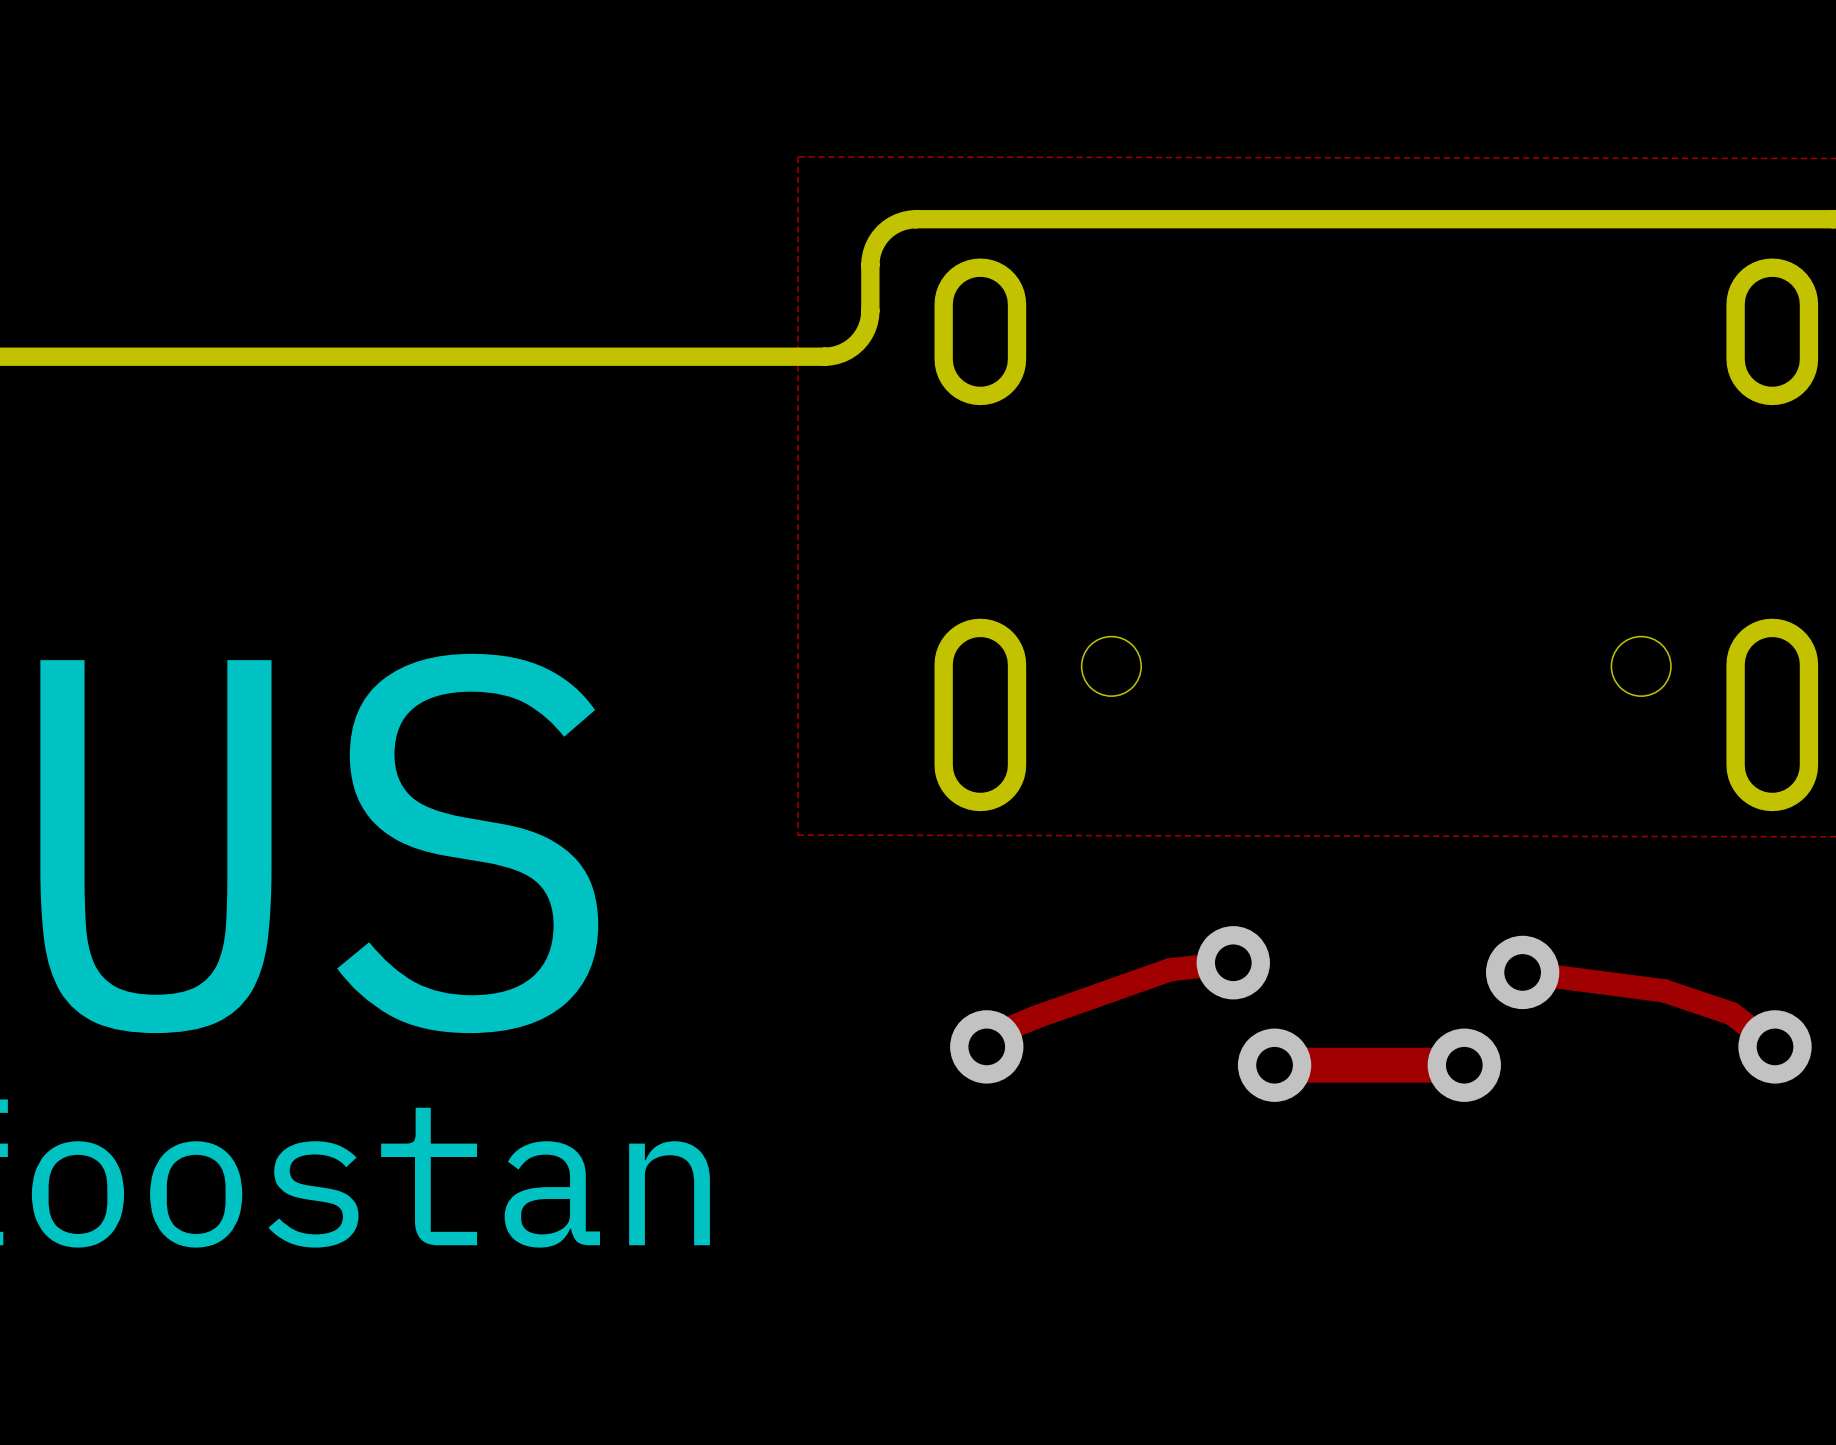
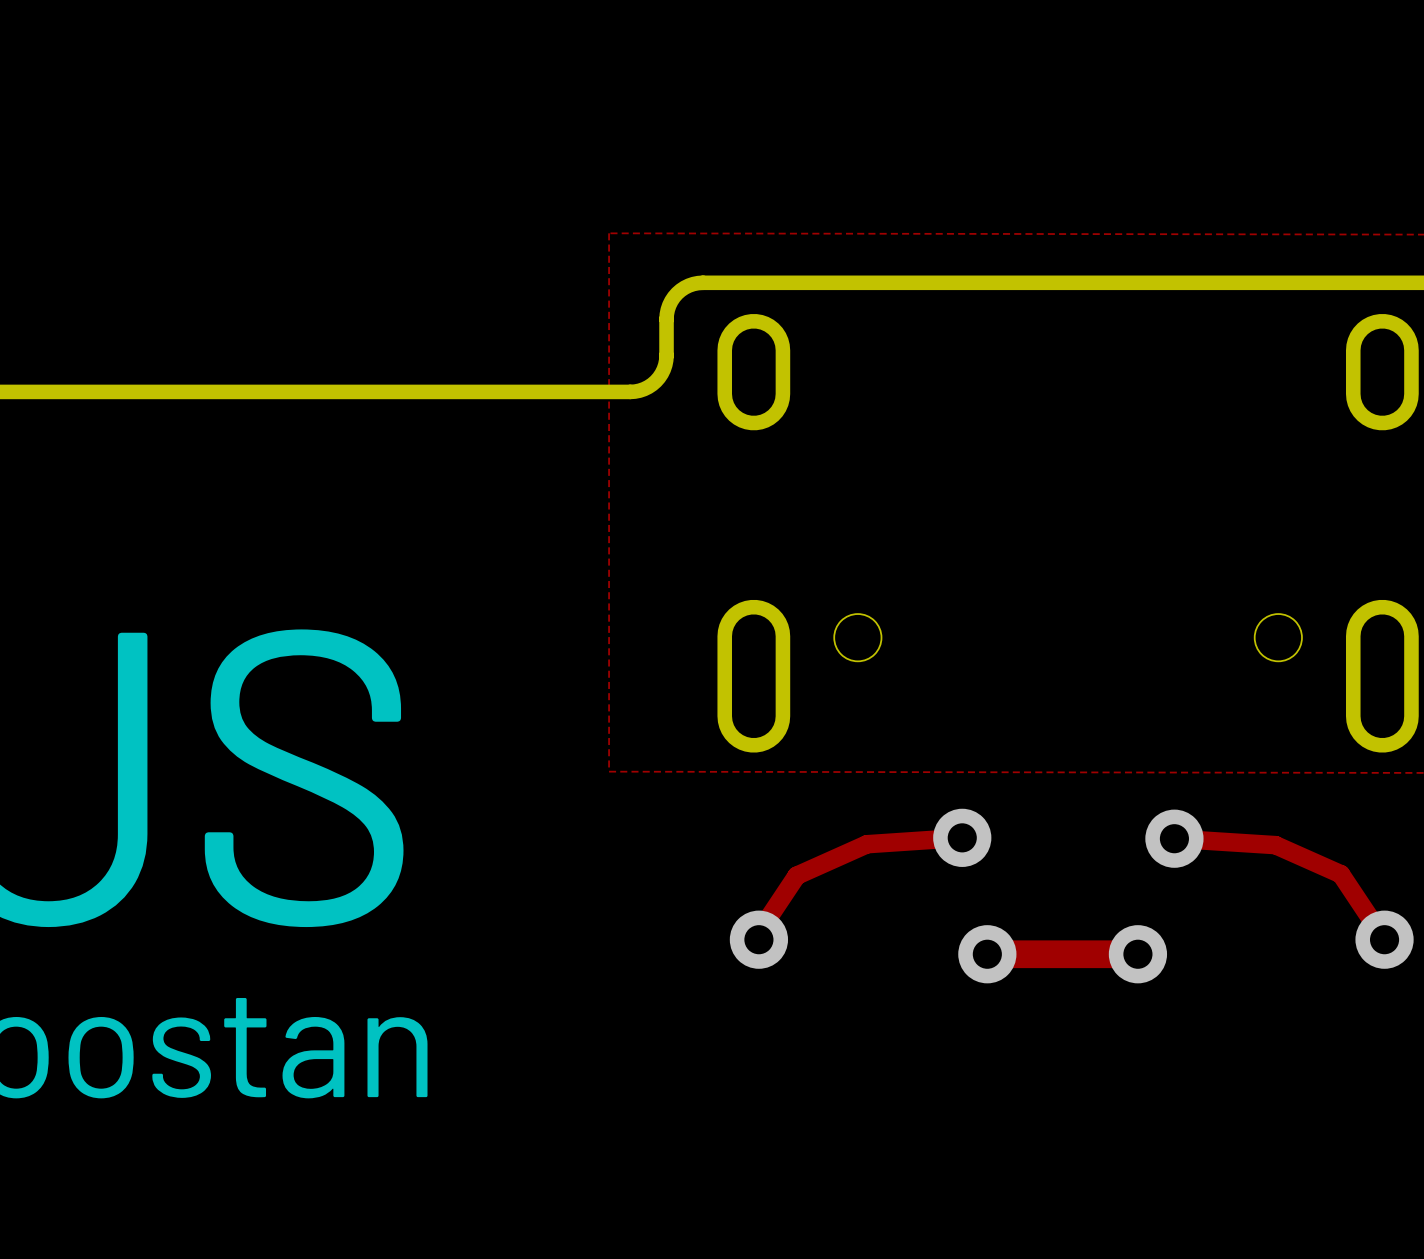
track: (1233, 962) (1170, 969) (1035, 1017) (986, 1037) -> (962, 837) (867, 844) (796, 875) (758, 932)
via position: (1233, 962) -> (962, 837)
track: (1522, 972) (1664, 990) (1731, 1013) (1775, 1046) -> (1174, 838) (1275, 845) (1340, 874) (1384, 939)
via position: (1522, 972) -> (1174, 838)

